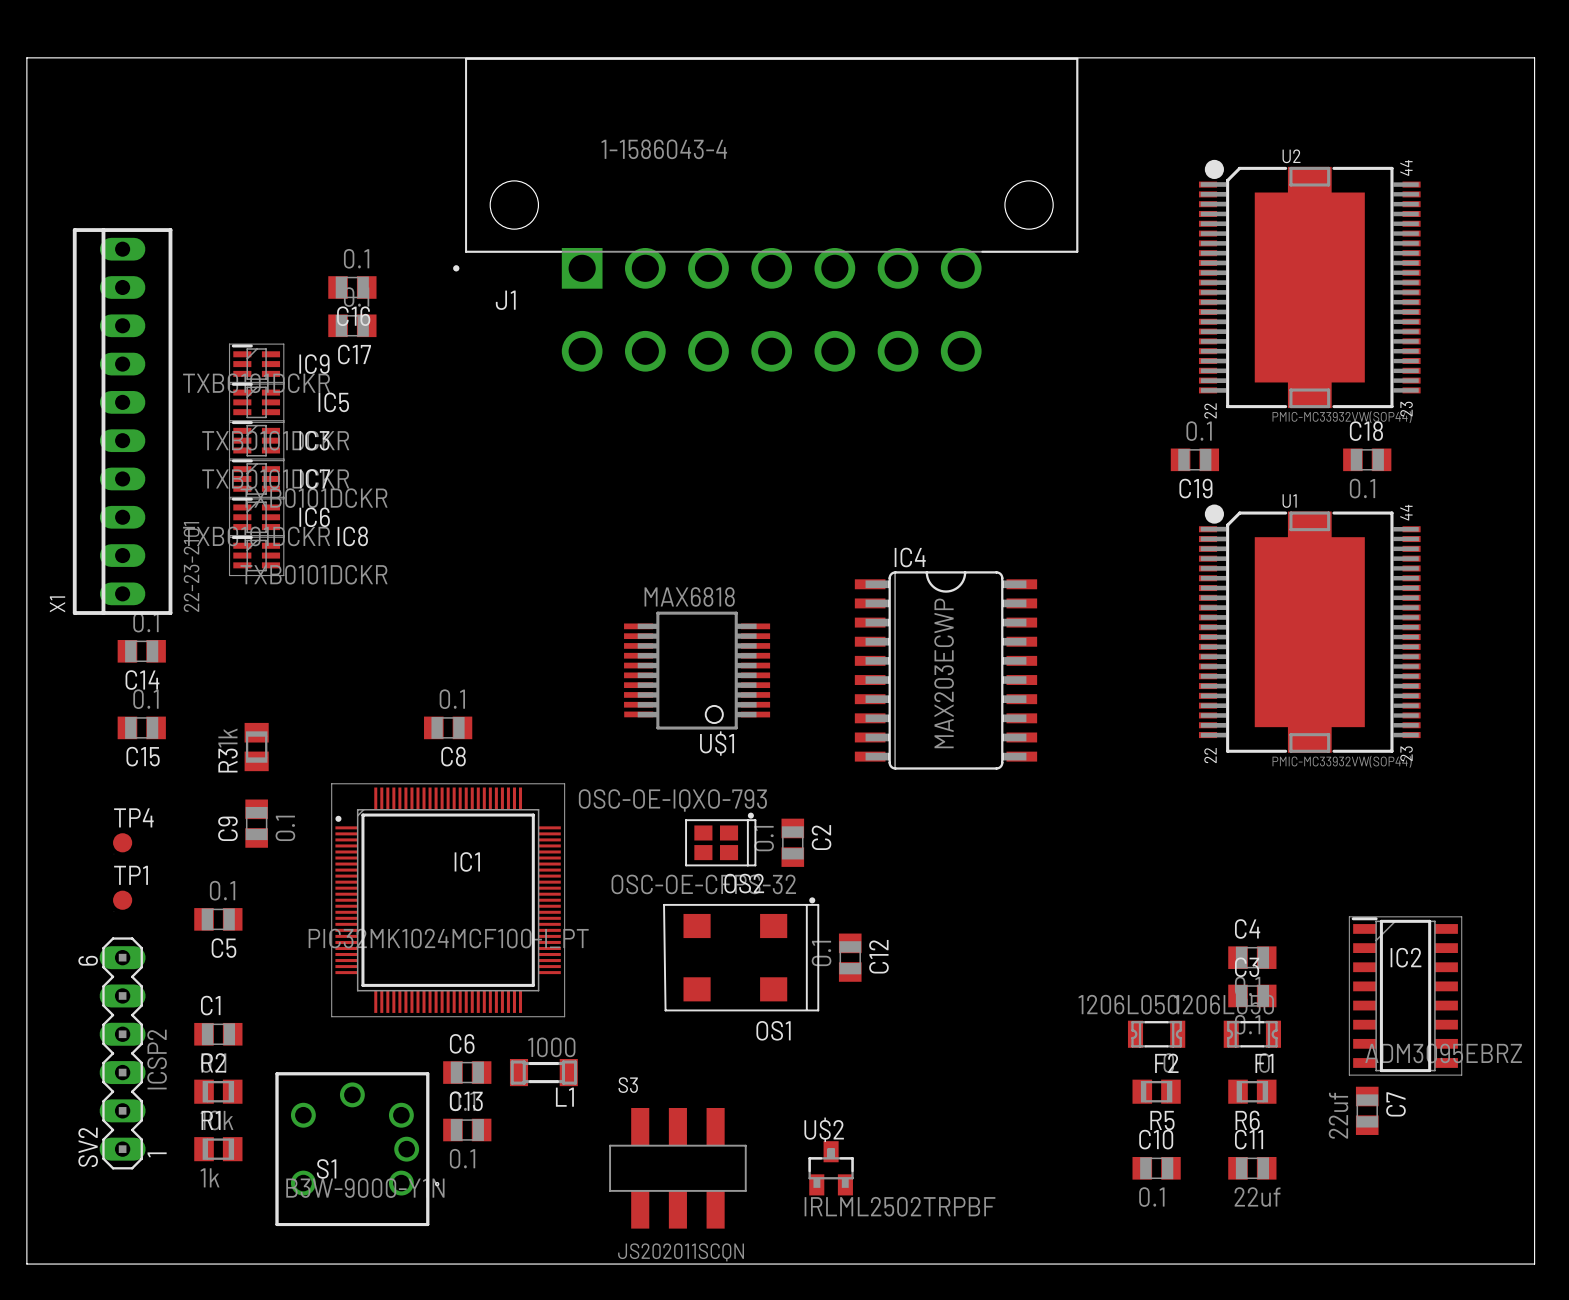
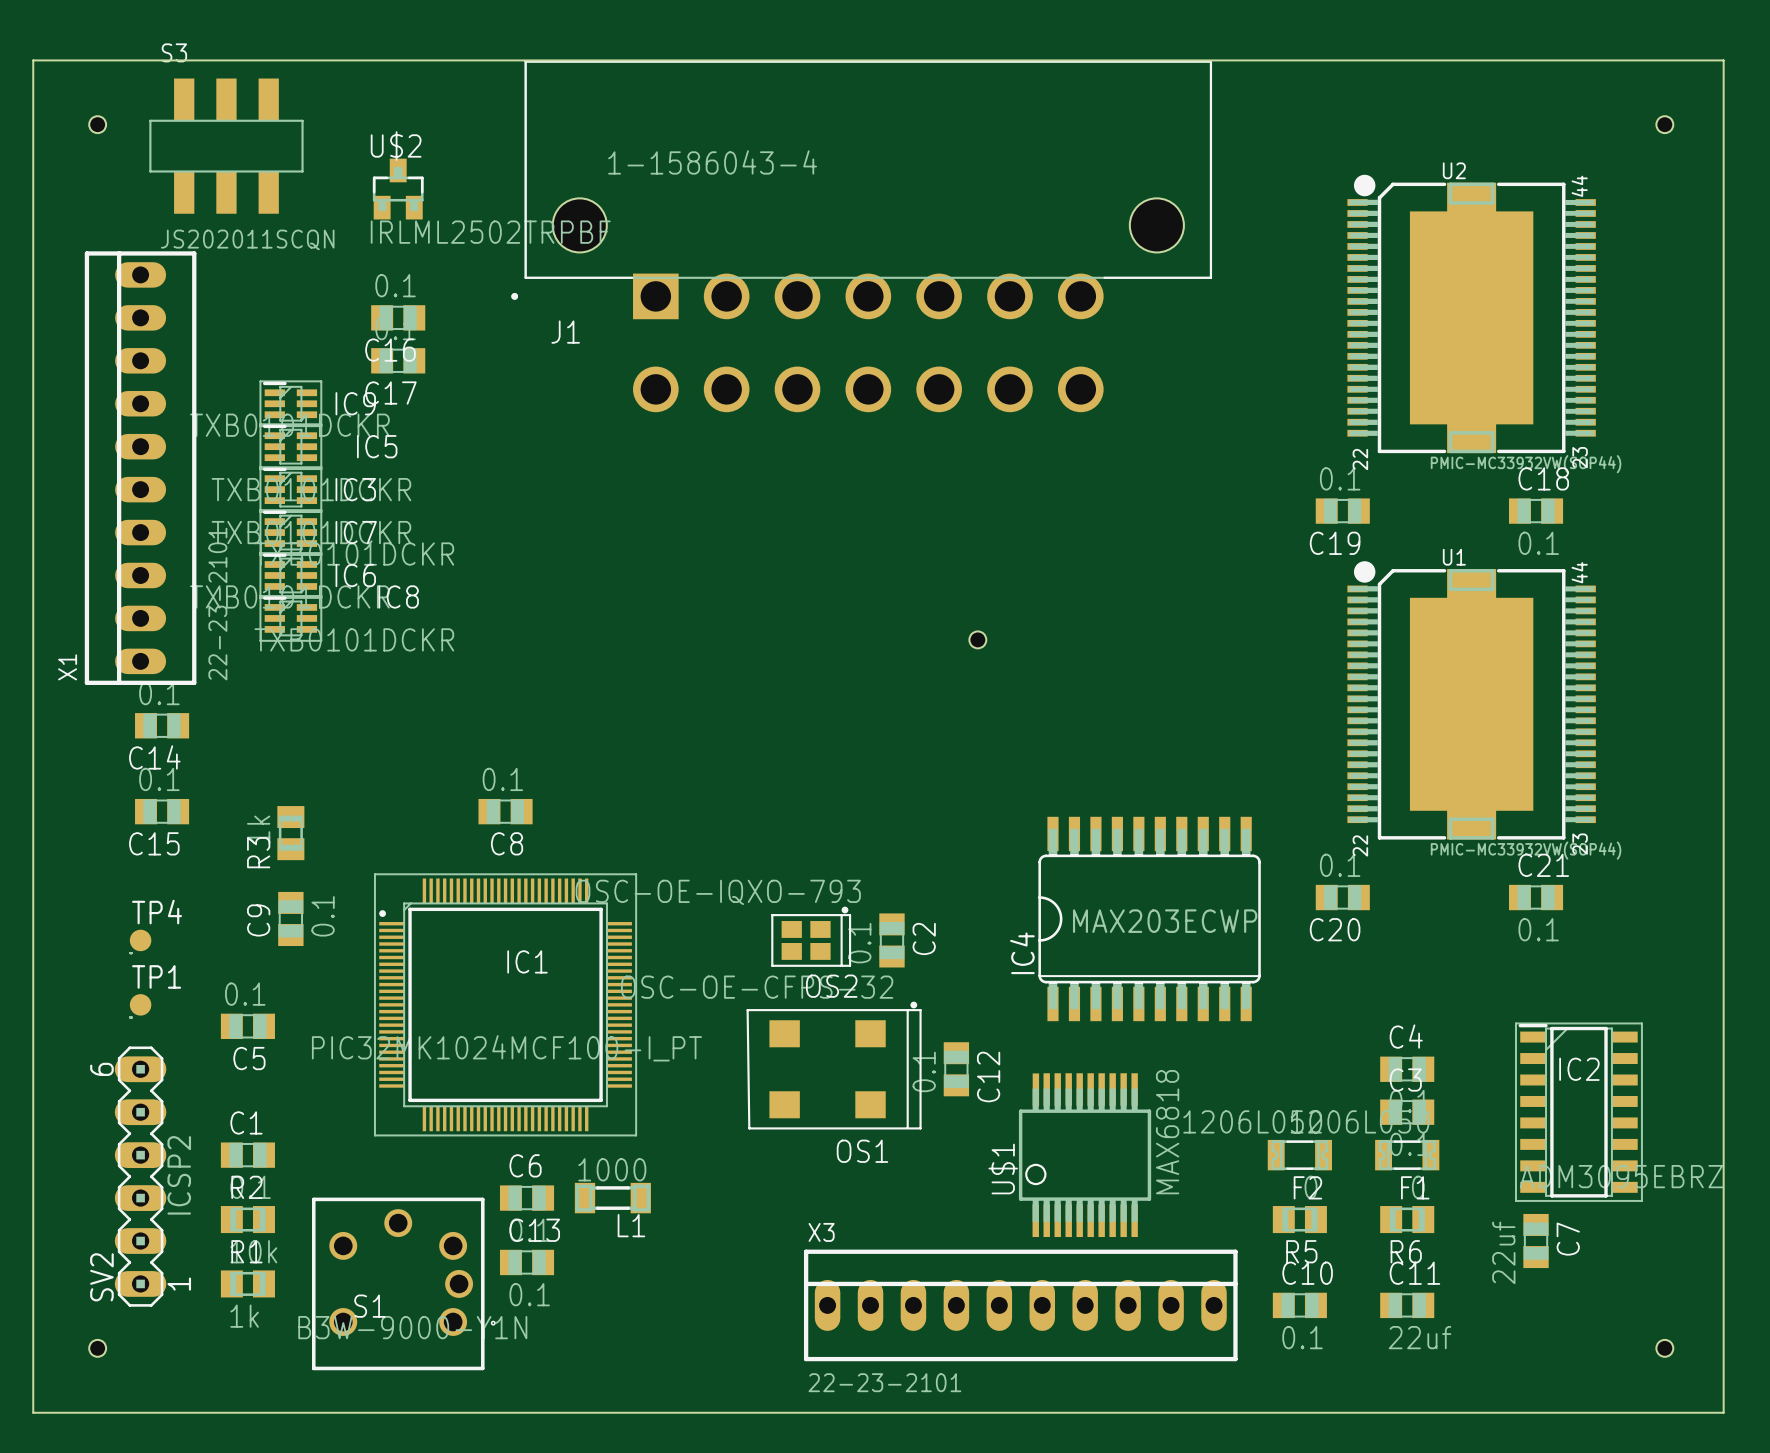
hole: none -> (97, 124)
hole: none -> (1664, 124)
hole: none -> (977, 639)
U$1 rotation: 0° (697, 670) -> 90° clockwise (1085, 1155)
U$1 position: (697, 670) -> (1085, 1155)
IC4 rotation: 0° (945, 670) -> 90° counterclockwise (1149, 918)
IC4 position: (945, 670) -> (1149, 918)
C20: none -> 0.1 (1342, 897)
C21: none -> 0.1 (1536, 897)
S3 position: (677, 1168) -> (226, 146)
U$2 position: (831, 1168) -> (398, 189)
X3: none -> 22-23-2101 (1020, 1305)
hole: none -> (97, 1348)
hole: none -> (1664, 1348)

